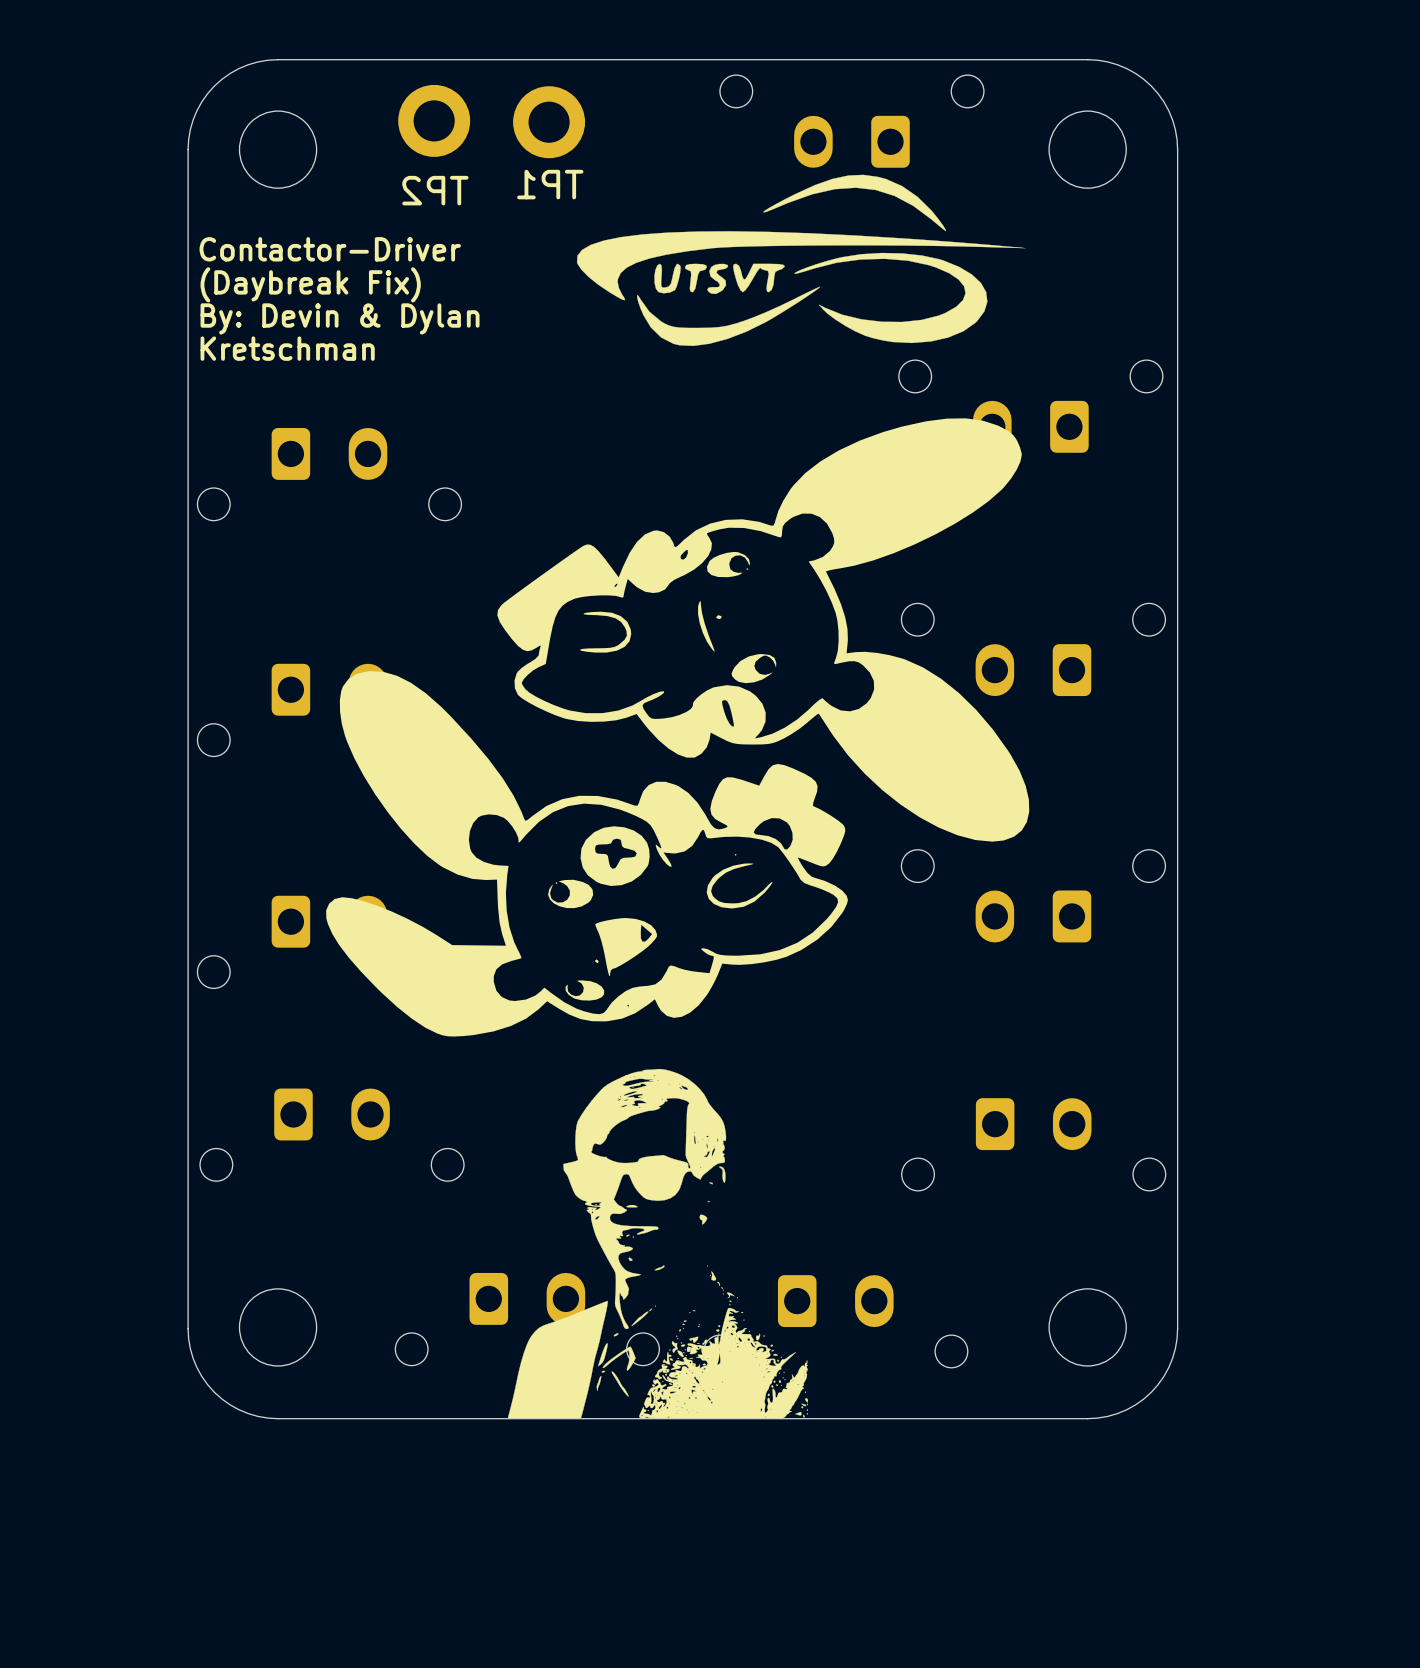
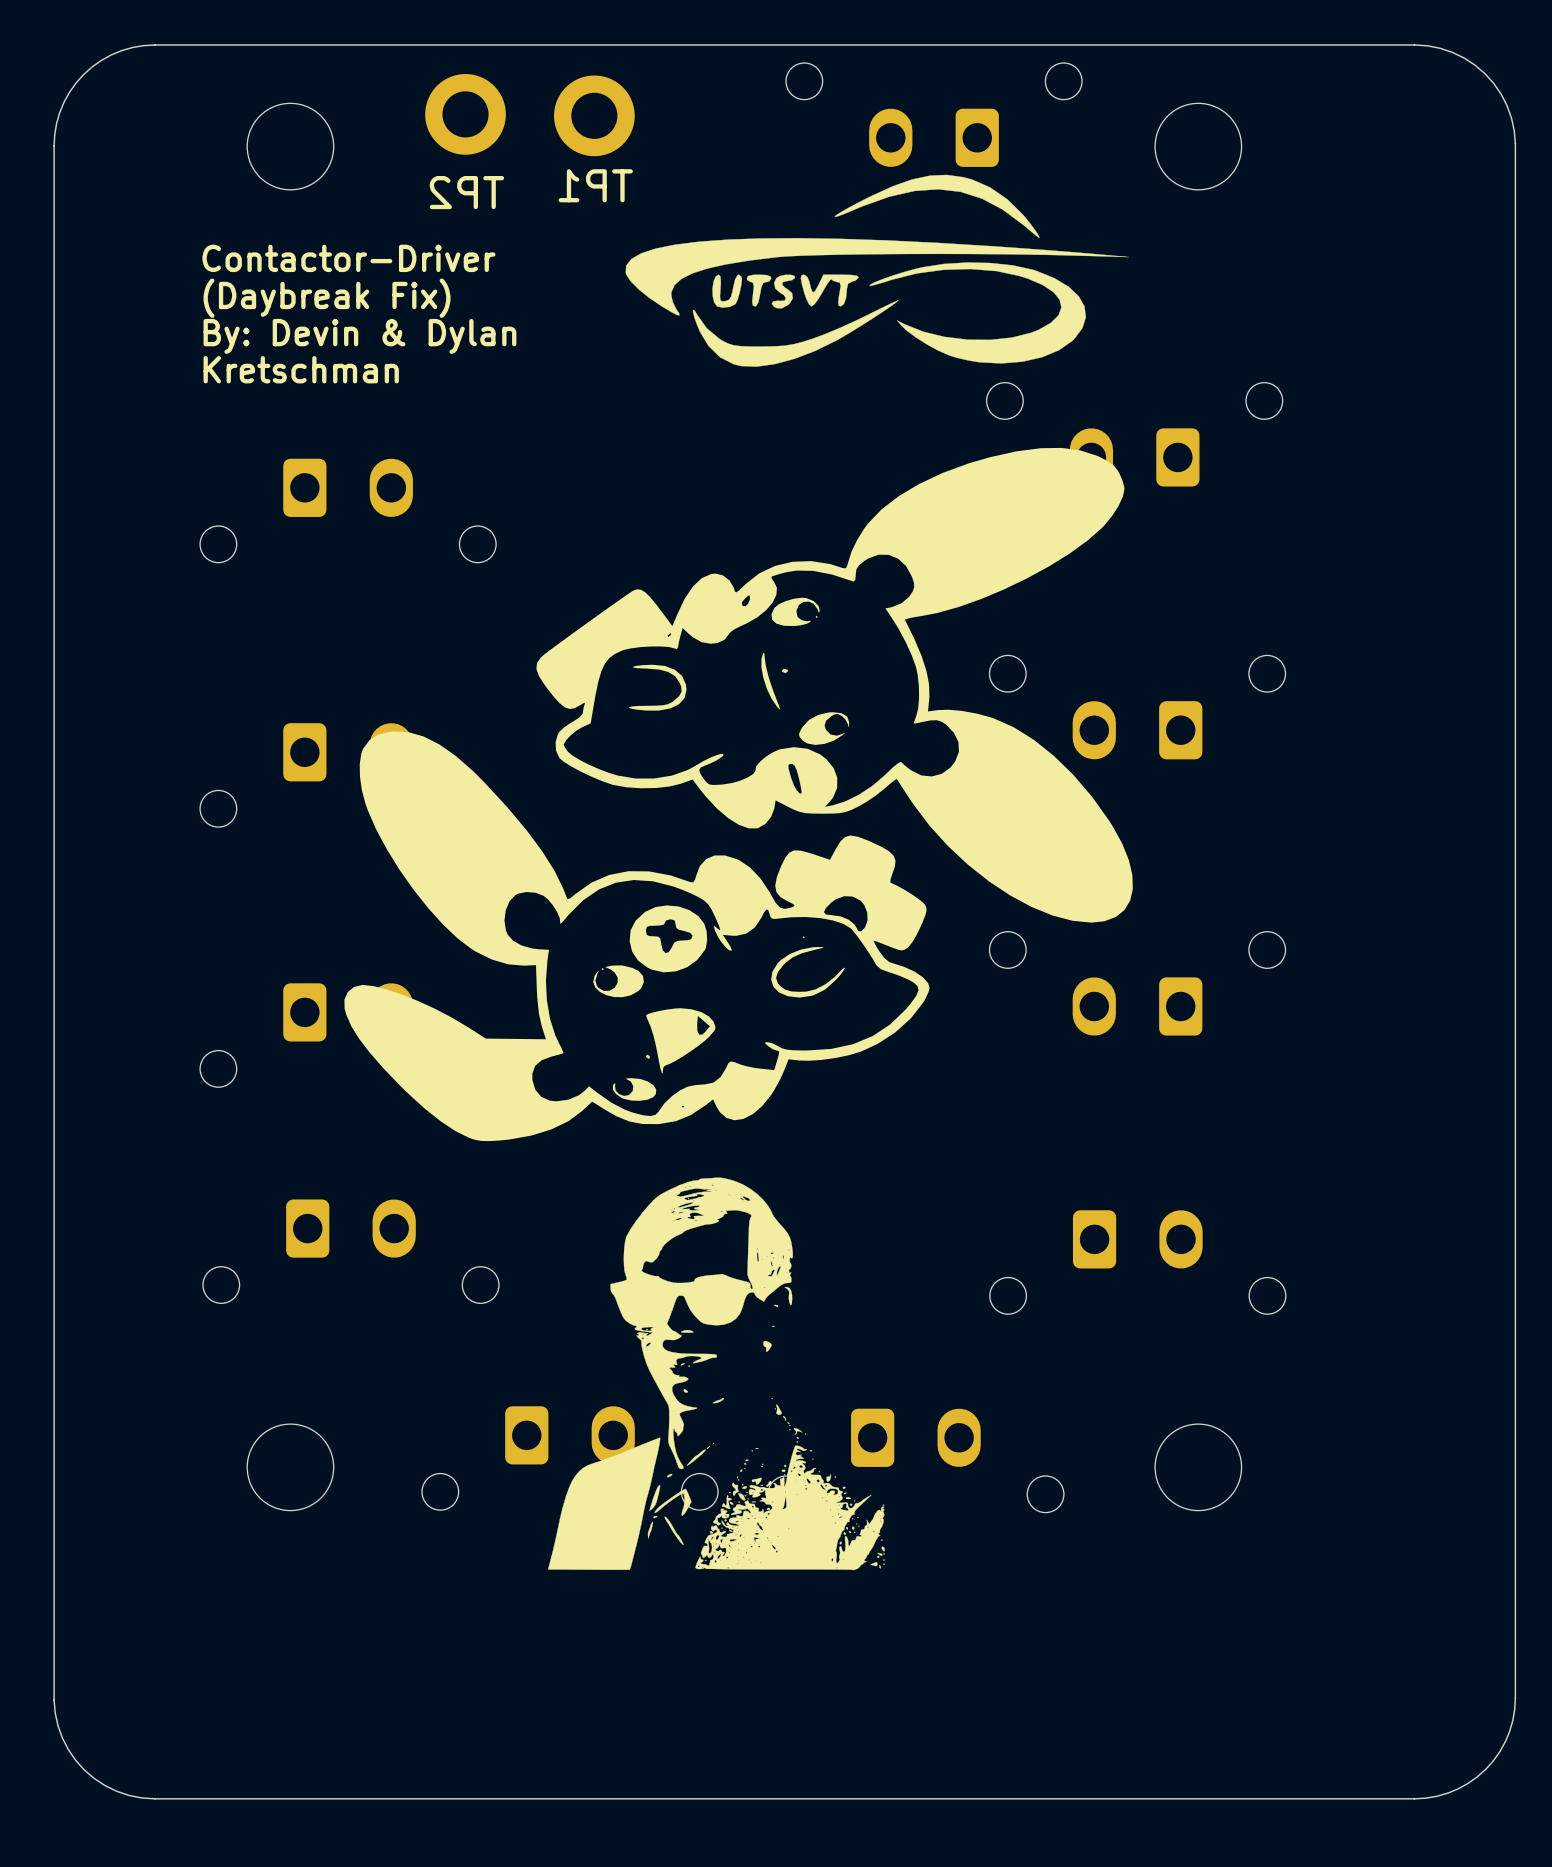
board edge: (1087, 59) (278, 59) (258, 61) (230, 73) (214, 86) (201, 101) (193, 119) (188, 149) (188, 1328) (190, 1348) (197, 1367) (214, 1392) (230, 1404) (248, 1413) (278, 1418) (1087, 1418) (1107, 1416) (1126, 1409) (1143, 1399) (1163, 1376) (1172, 1358) (1177, 1328) (1177, 139) (1168, 110) (1157, 93) (1143, 79) (1117, 64) (1087, 59) -> (1414, 44) (1427, 45) (1452, 52) (1475, 65) (1485, 73) (1501, 94) (1507, 105) (1511, 118) (1515, 143) (1515, 1697) (1509, 1731) (1493, 1760) (1477, 1776) (1458, 1788) (1436, 1796) (1414, 1798) (154, 1798) (141, 1797) (116, 1791) (94, 1778) (75, 1760) (68, 1749) (58, 1725) (54, 1700) (54, 145) (59, 112) (76, 82) (92, 67) (111, 54) (132, 47) (154, 44) (1414, 44)

